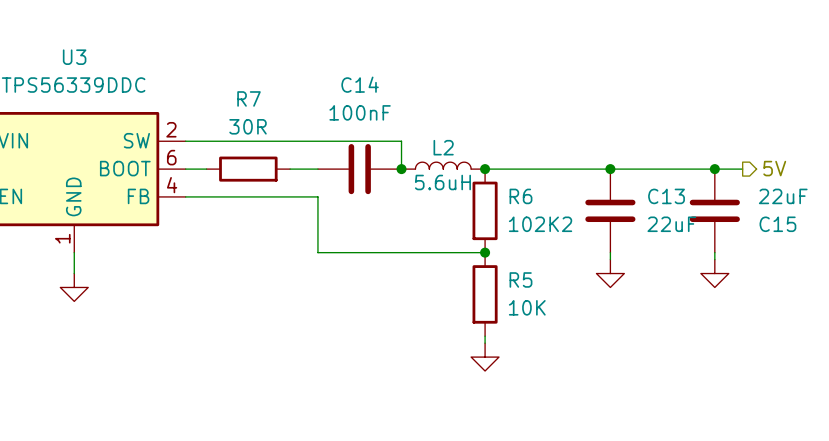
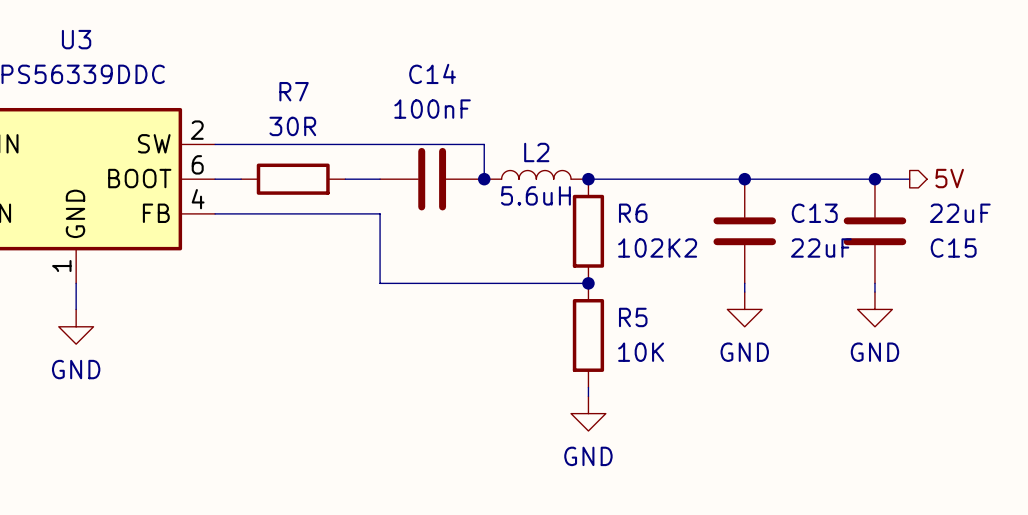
power symbol text: none -> GND (744, 352)
power symbol text: none -> GND (874, 352)
power symbol text: none -> GND (76, 369)
power symbol text: none -> GND (588, 456)

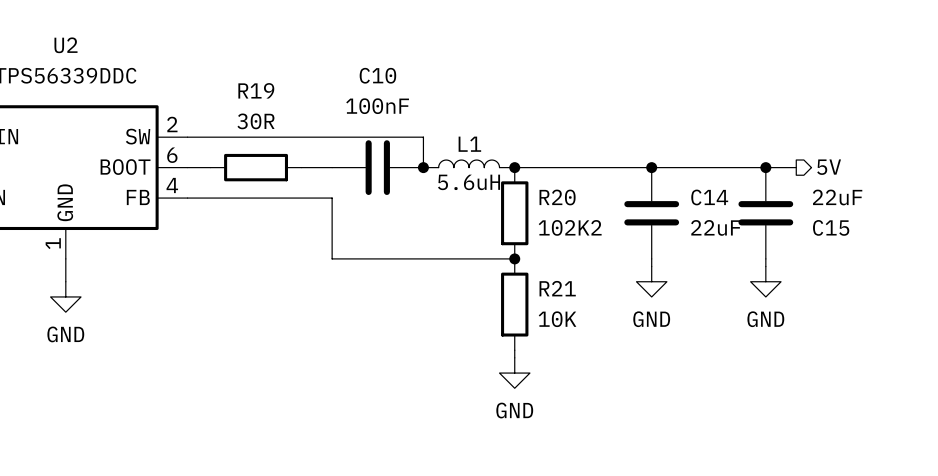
U3 name: U3 (76, 39) -> U2 (65, 45)
C14 name: C14 (432, 73) -> C10 (377, 75)
R7 name: R7 (294, 91) -> R19 (256, 90)
L2 name: L2 (536, 152) -> L1 (469, 144)
R6 name: R6 (633, 213) -> R20 (557, 197)
C13 name: C13 (814, 213) -> C14 (709, 197)
R5 name: R5 (633, 317) -> R21 (557, 288)

